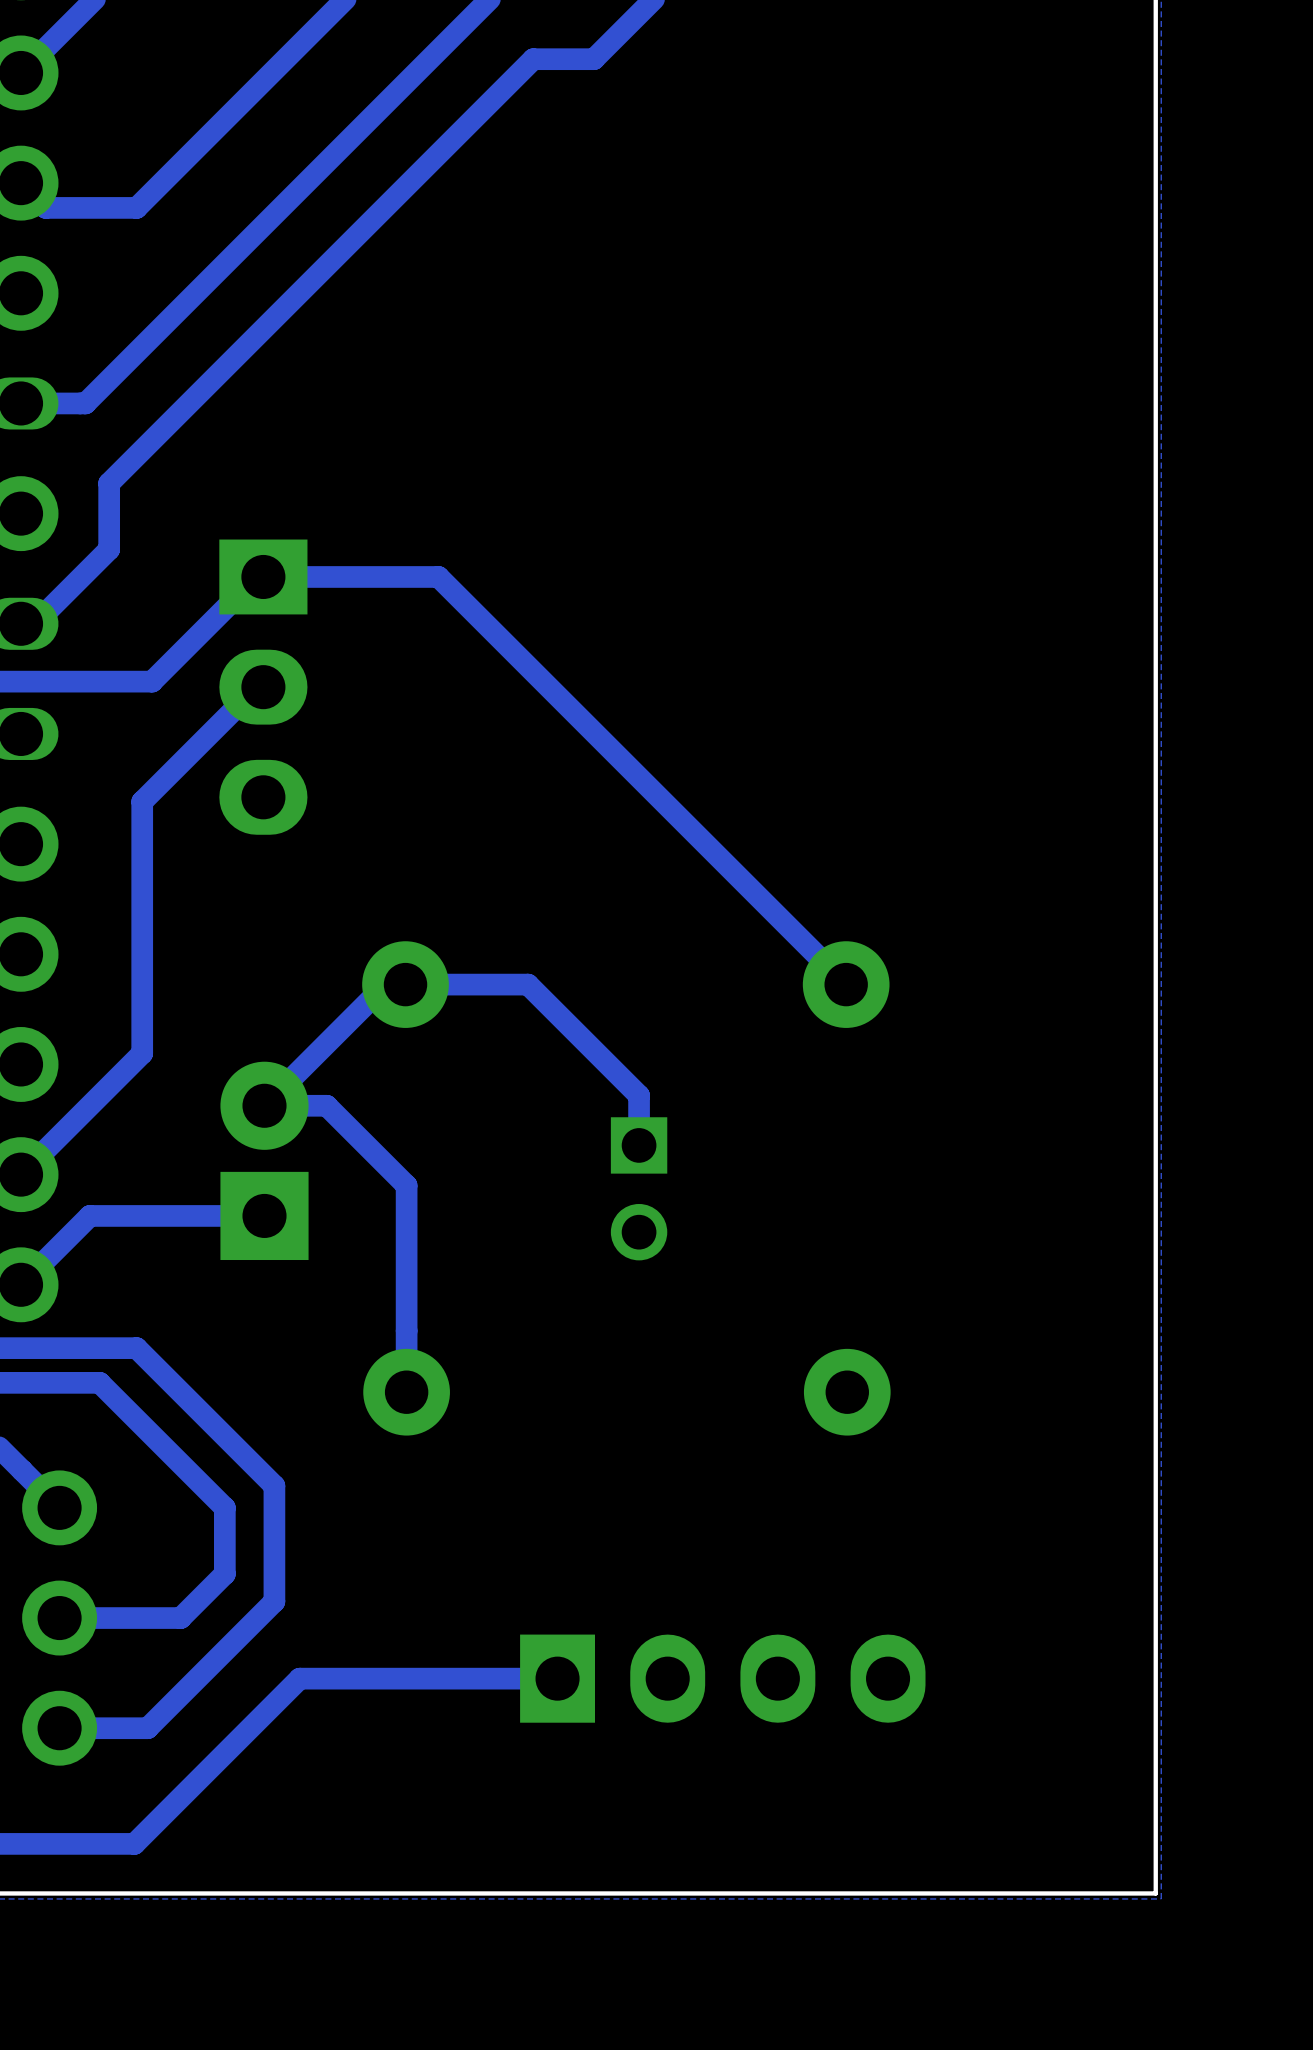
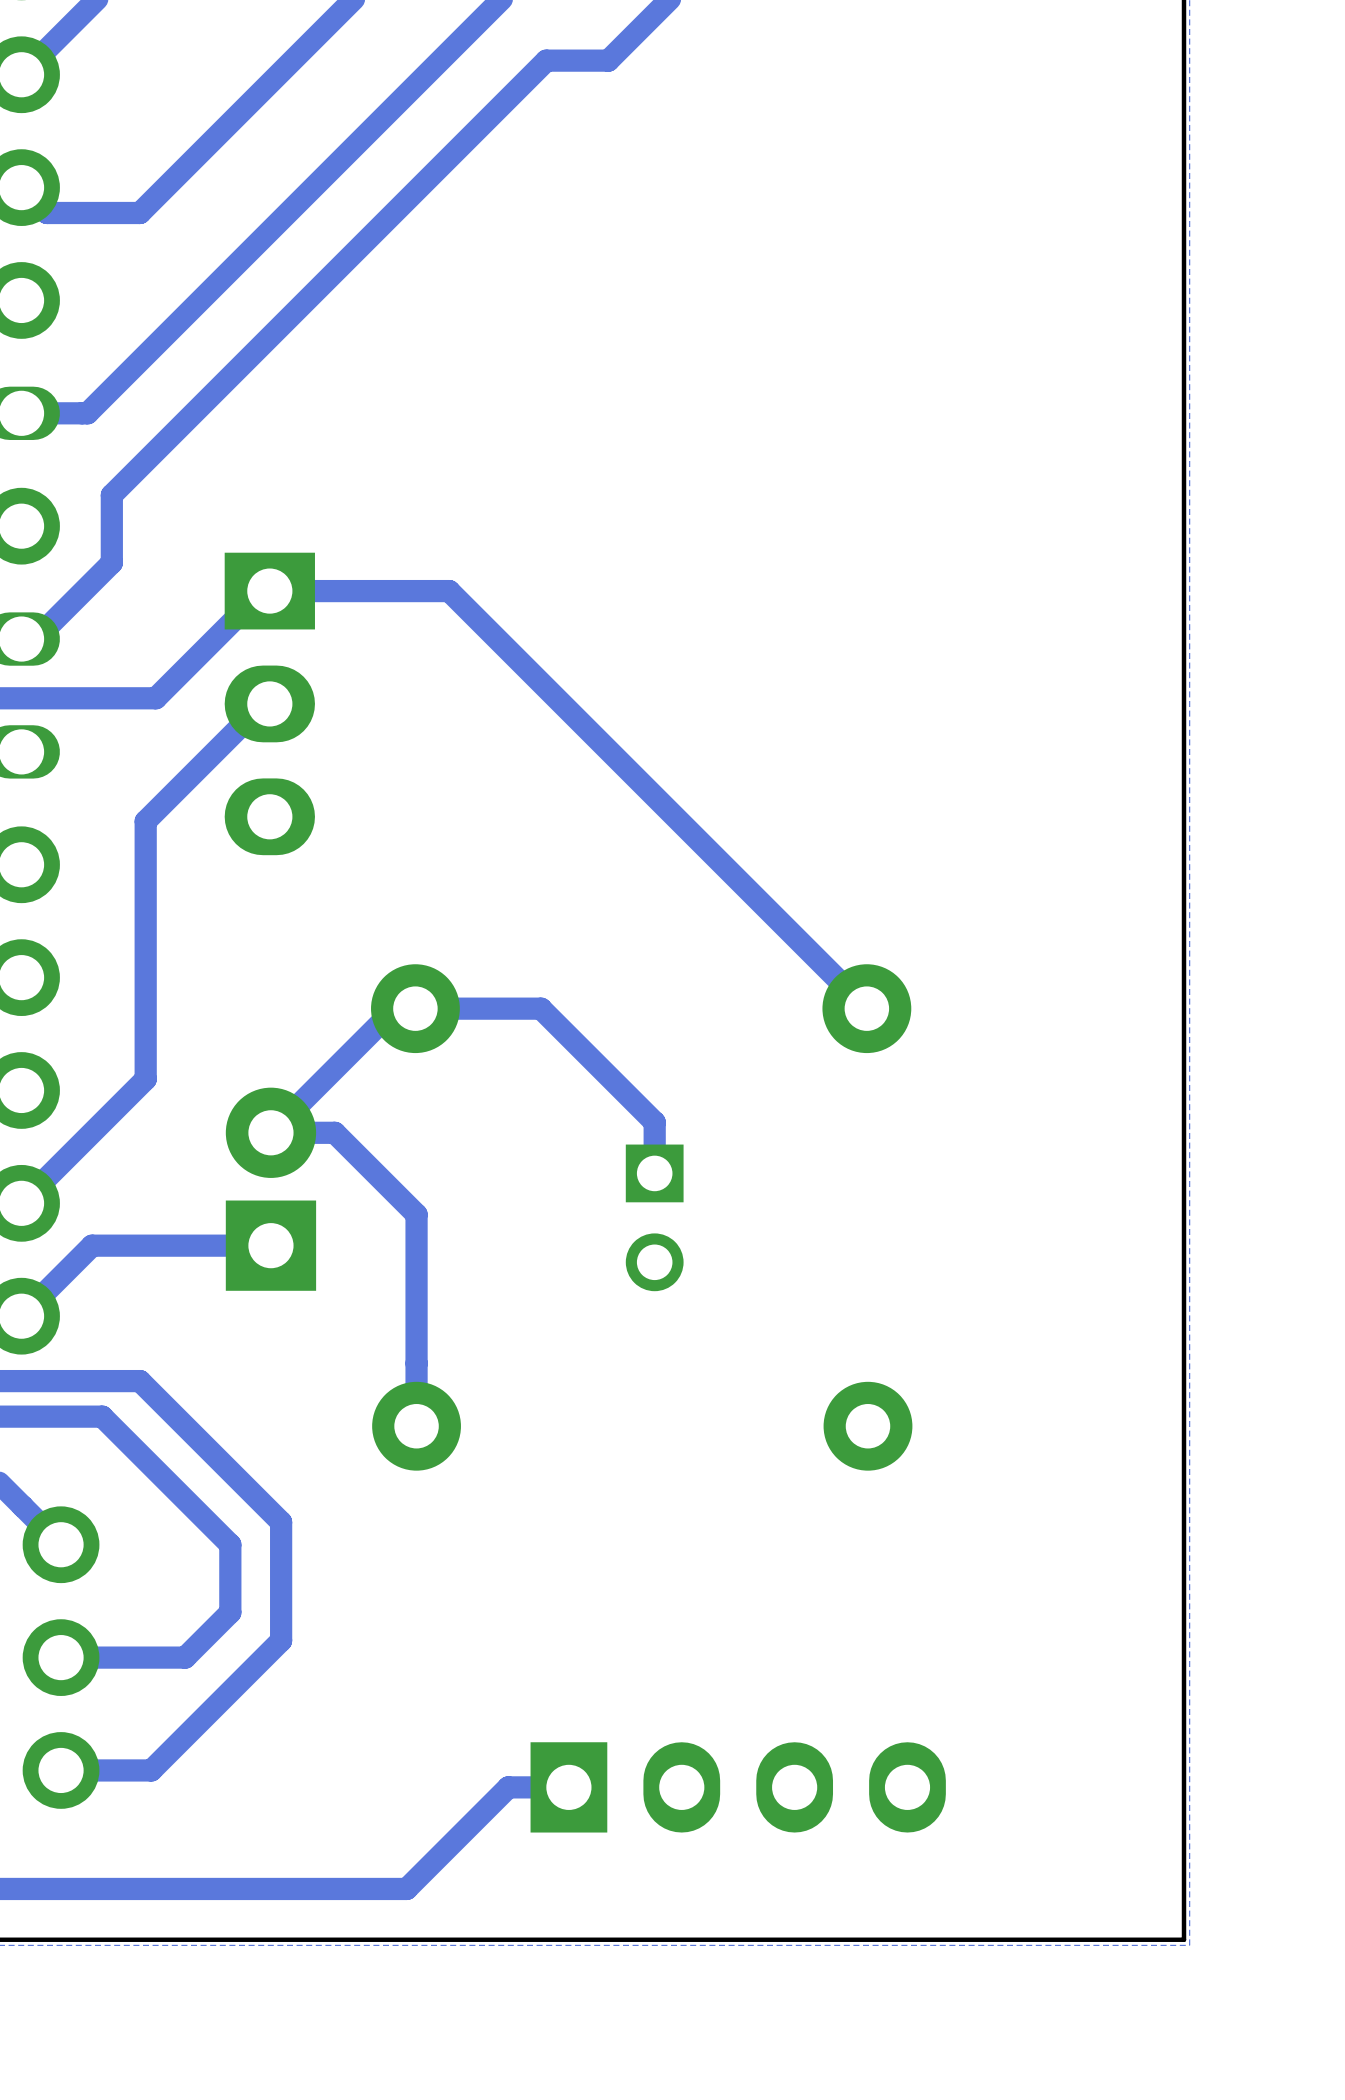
track: (557, 1678) (299, 1678) (134, 1843) -> (568, 1787) (508, 1787) (406, 1888) (137, 1888)
part position: (722, 1678) -> (738, 1787)

